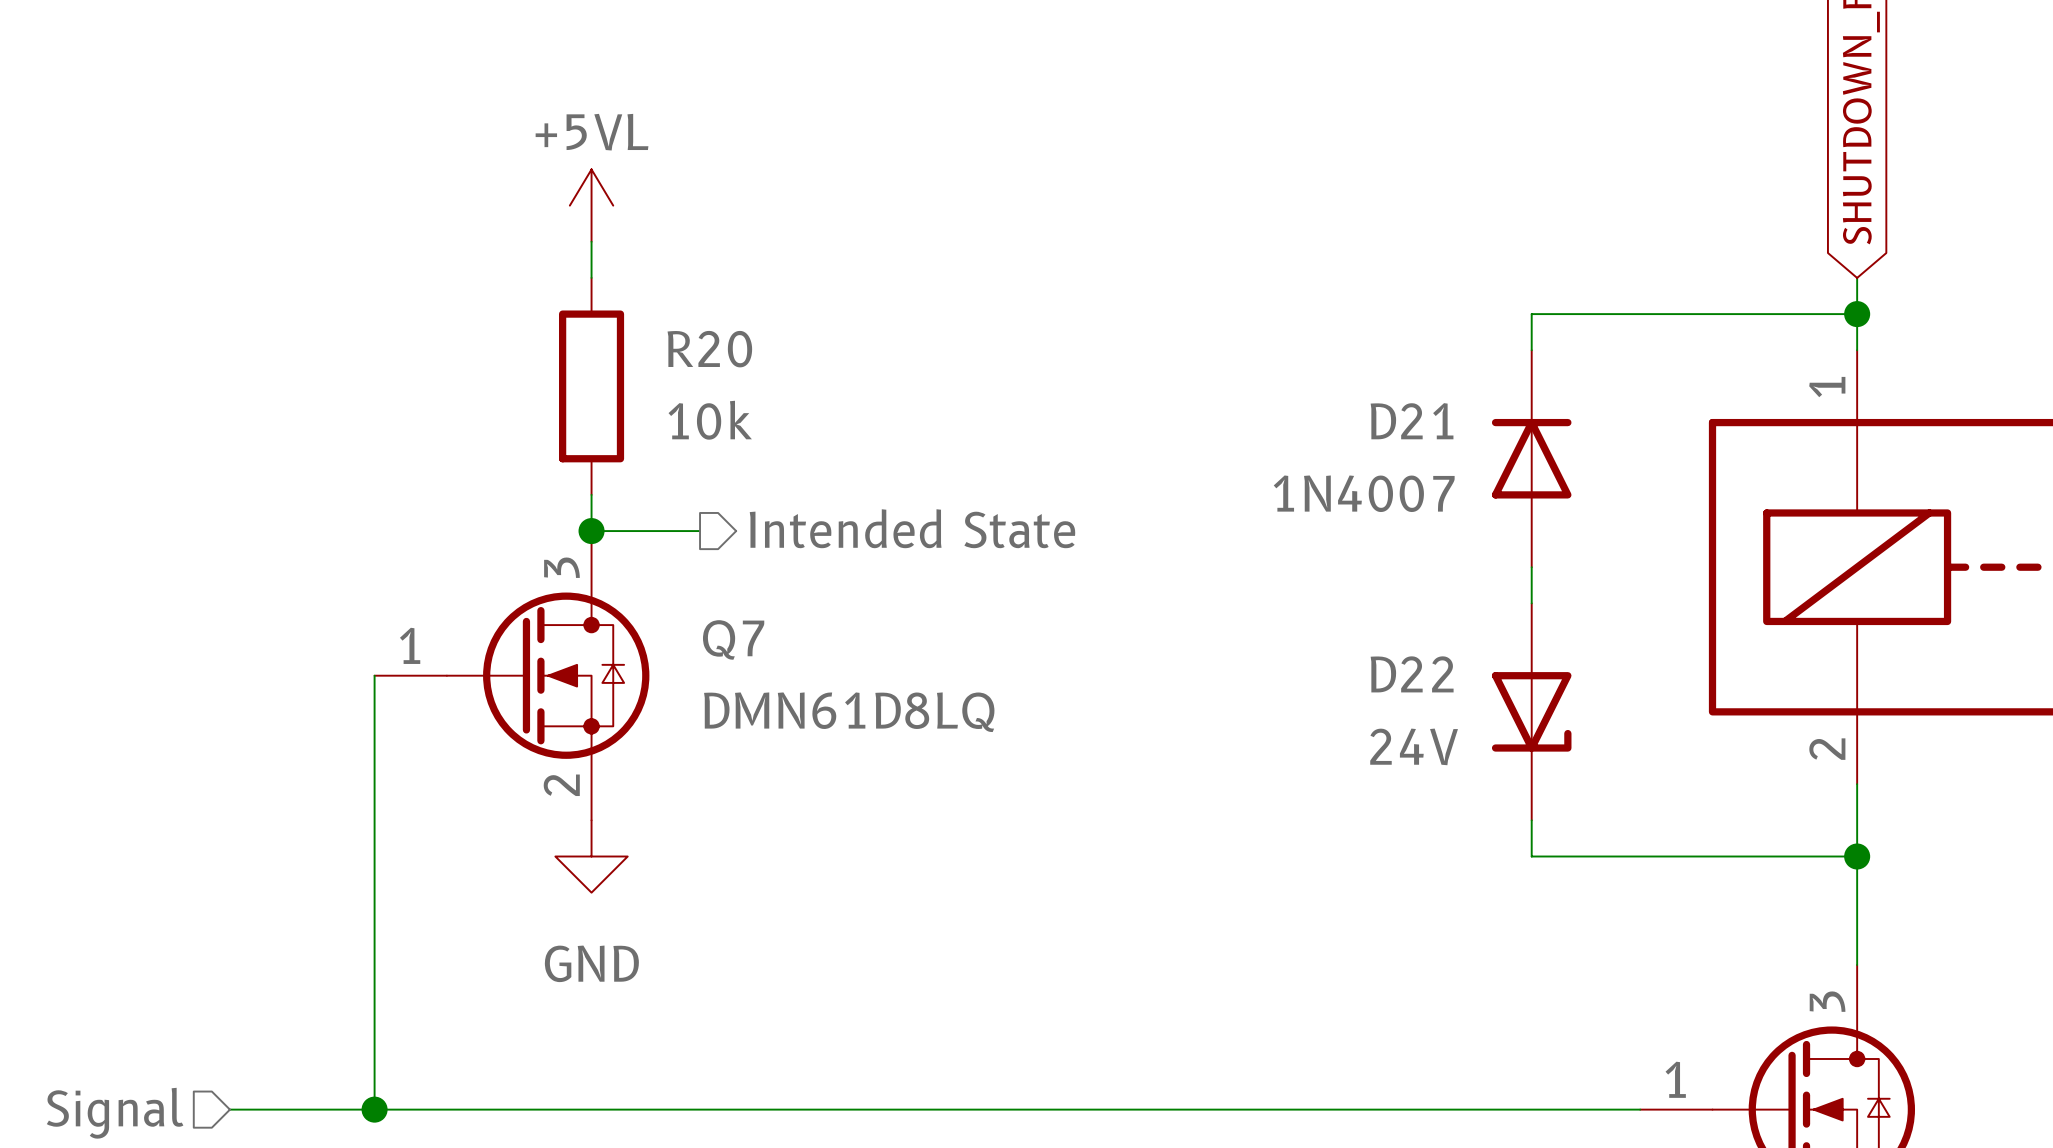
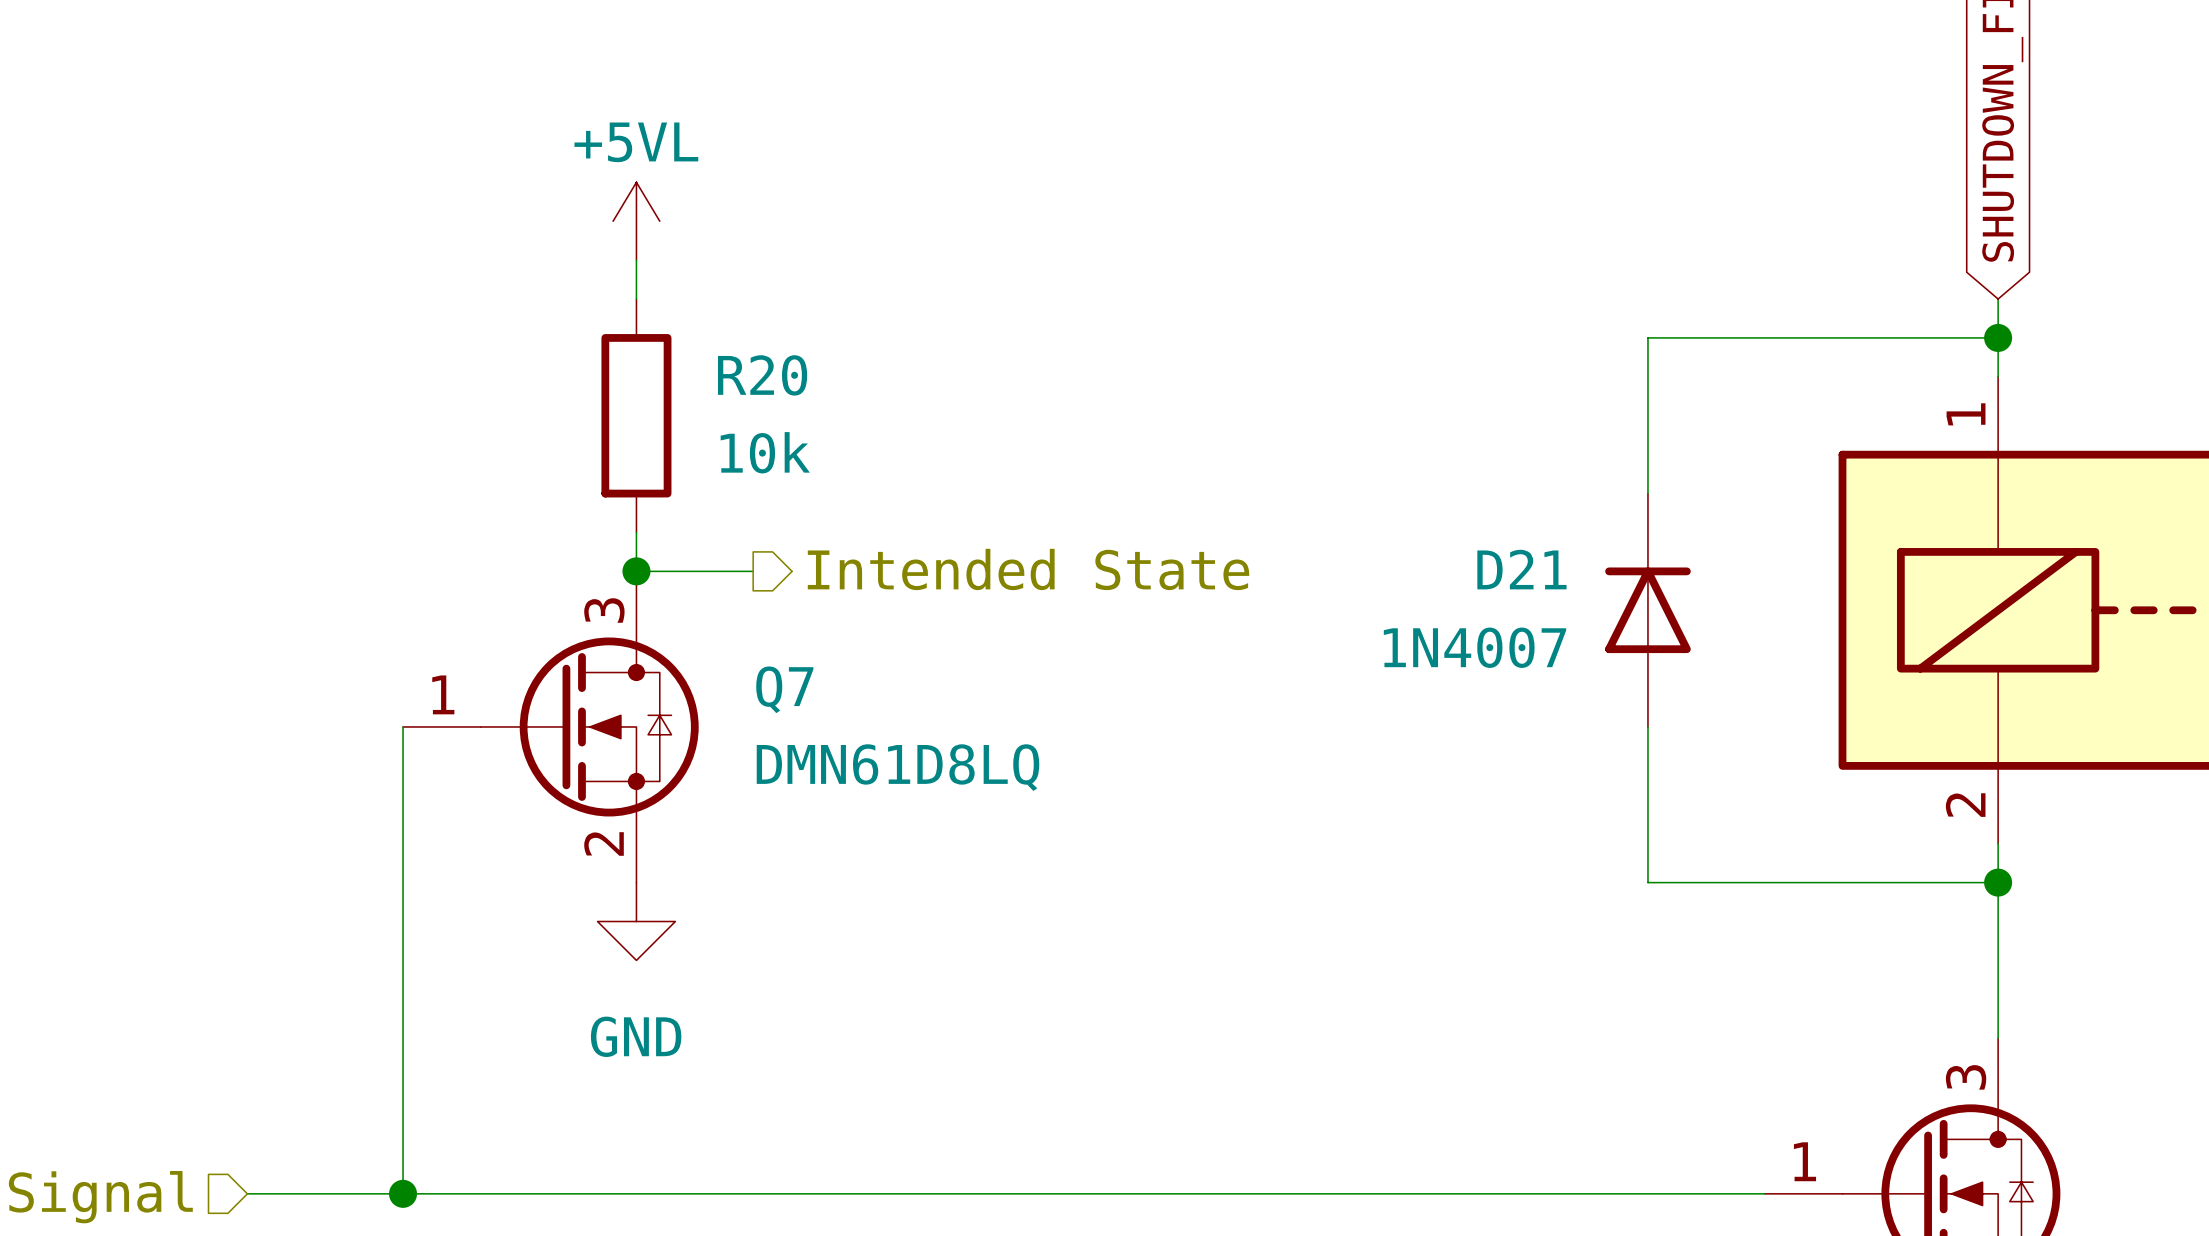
D21 position: (1531, 458) -> (1647, 610)
wire: none -> (1647, 726) (1647, 882) (1998, 882)
D22: 24V (1531, 711) -> none
wire: (1531, 820) (1531, 856) (1857, 856) -> none
junction position: (1857, 856) -> (1998, 882)

